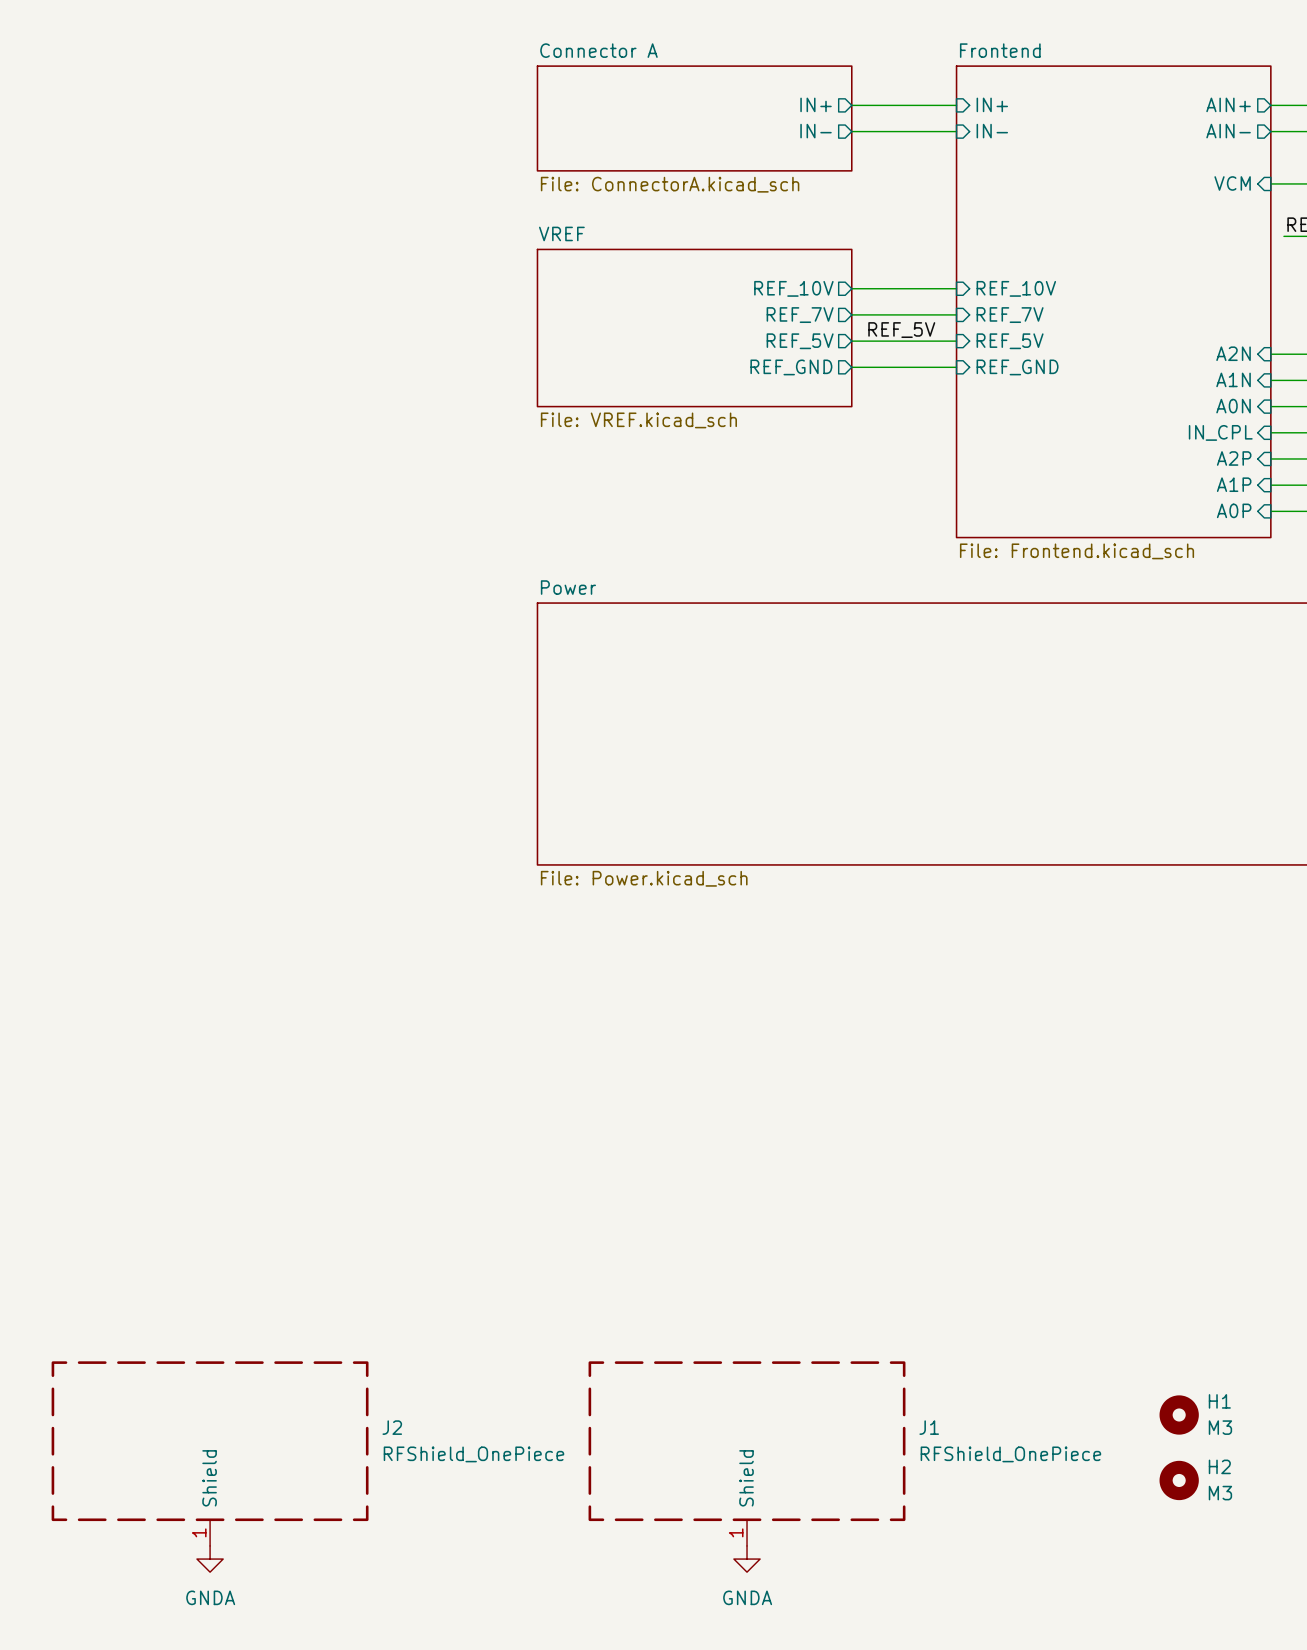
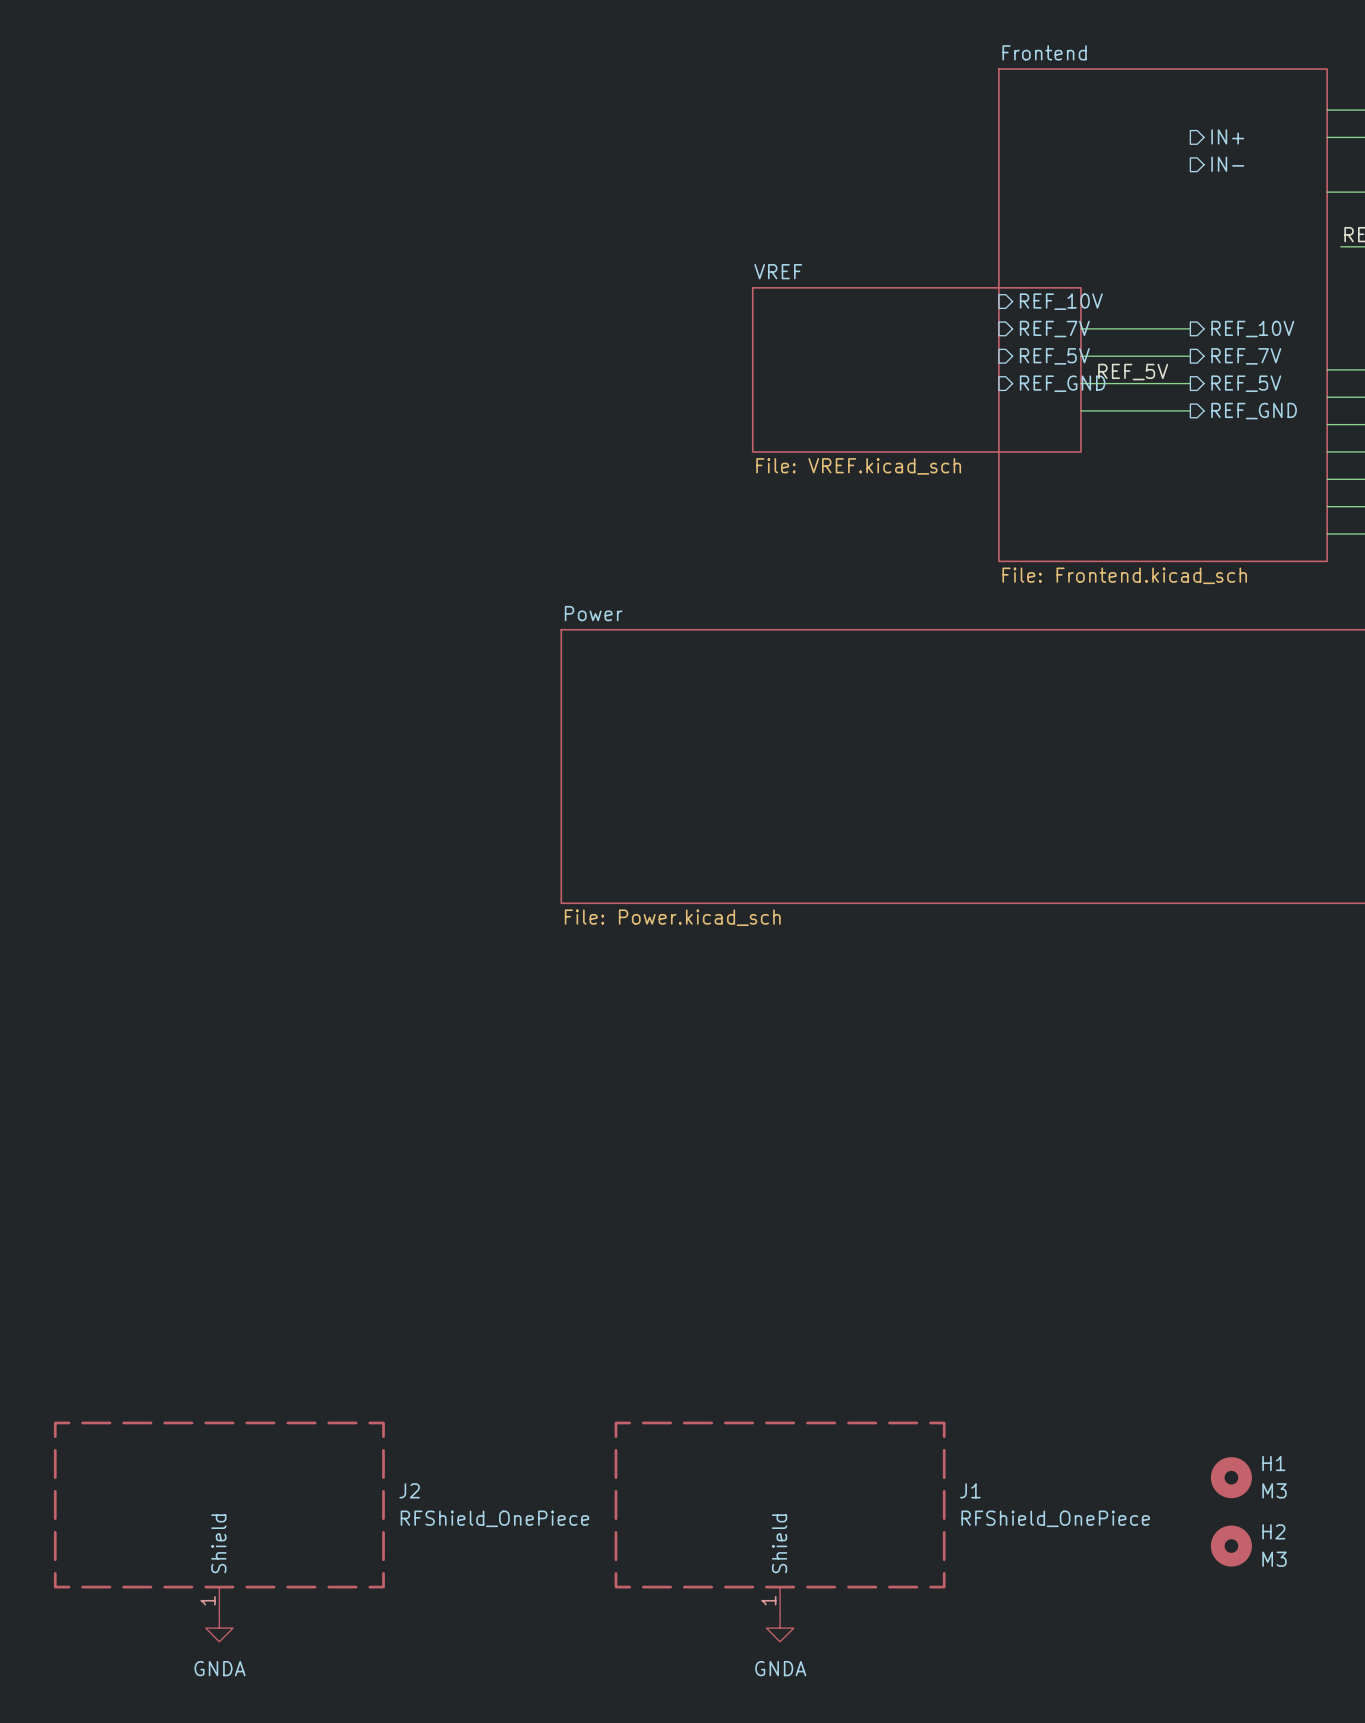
sheet pin: IN+ (816, 104) -> none
sheet pin: IN+ (992, 104) -> none
sheet pin shape: output (1228, 104) -> input (1227, 136)
sheet pin: AIN+ (1228, 104) -> IN+ (1227, 136)
wire: (851, 105) (956, 105) -> none
sheet Connector A: File: ConnectorA.kicad_sch (694, 118) -> none
sheet pin: IN- (816, 131) -> none
wire: (851, 131) (956, 131) -> none
sheet pin: IN- (992, 131) -> none
sheet pin shape: output (1228, 131) -> input (1227, 164)
sheet pin: AIN- (1228, 131) -> IN- (1227, 164)
sheet pin: VCM (1232, 183) -> none
sheet pin: REF_10V (793, 288) -> none
wire: (851, 288) (956, 288) -> (1080, 328) (1190, 328)
wire: (851, 314) (956, 314) -> (1080, 356) (1190, 356)
sheet pin: REF_7V (800, 315) -> none
sheet pin: none -> REF_10V (1252, 329)
sheet VREF position: (694, 328) -> (916, 369)
label position: REF_5V (901, 330) -> REF_5V (1133, 372)
sheet pin: REF_5V (800, 341) -> none
wire: (851, 341) (956, 341) -> (1080, 383) (1190, 383)
sheet pin: none -> REF_7V (1246, 356)
sheet pin: A2N (1233, 353) -> none
sheet pin: REF_GND (791, 367) -> none
wire: (851, 367) (956, 367) -> (1080, 410) (1190, 410)
sheet pin: none -> REF_5V (1246, 383)
sheet pin: A1N (1233, 379) -> none
sheet pin: none -> REF_GND (1254, 411)
sheet pin: A0N (1233, 406) -> none
sheet pin: IN_CPL (1220, 432) -> none
sheet pin: A2P (1234, 458) -> none
sheet pin: A1P (1234, 484) -> none
sheet pin: A0P (1234, 510) -> none

